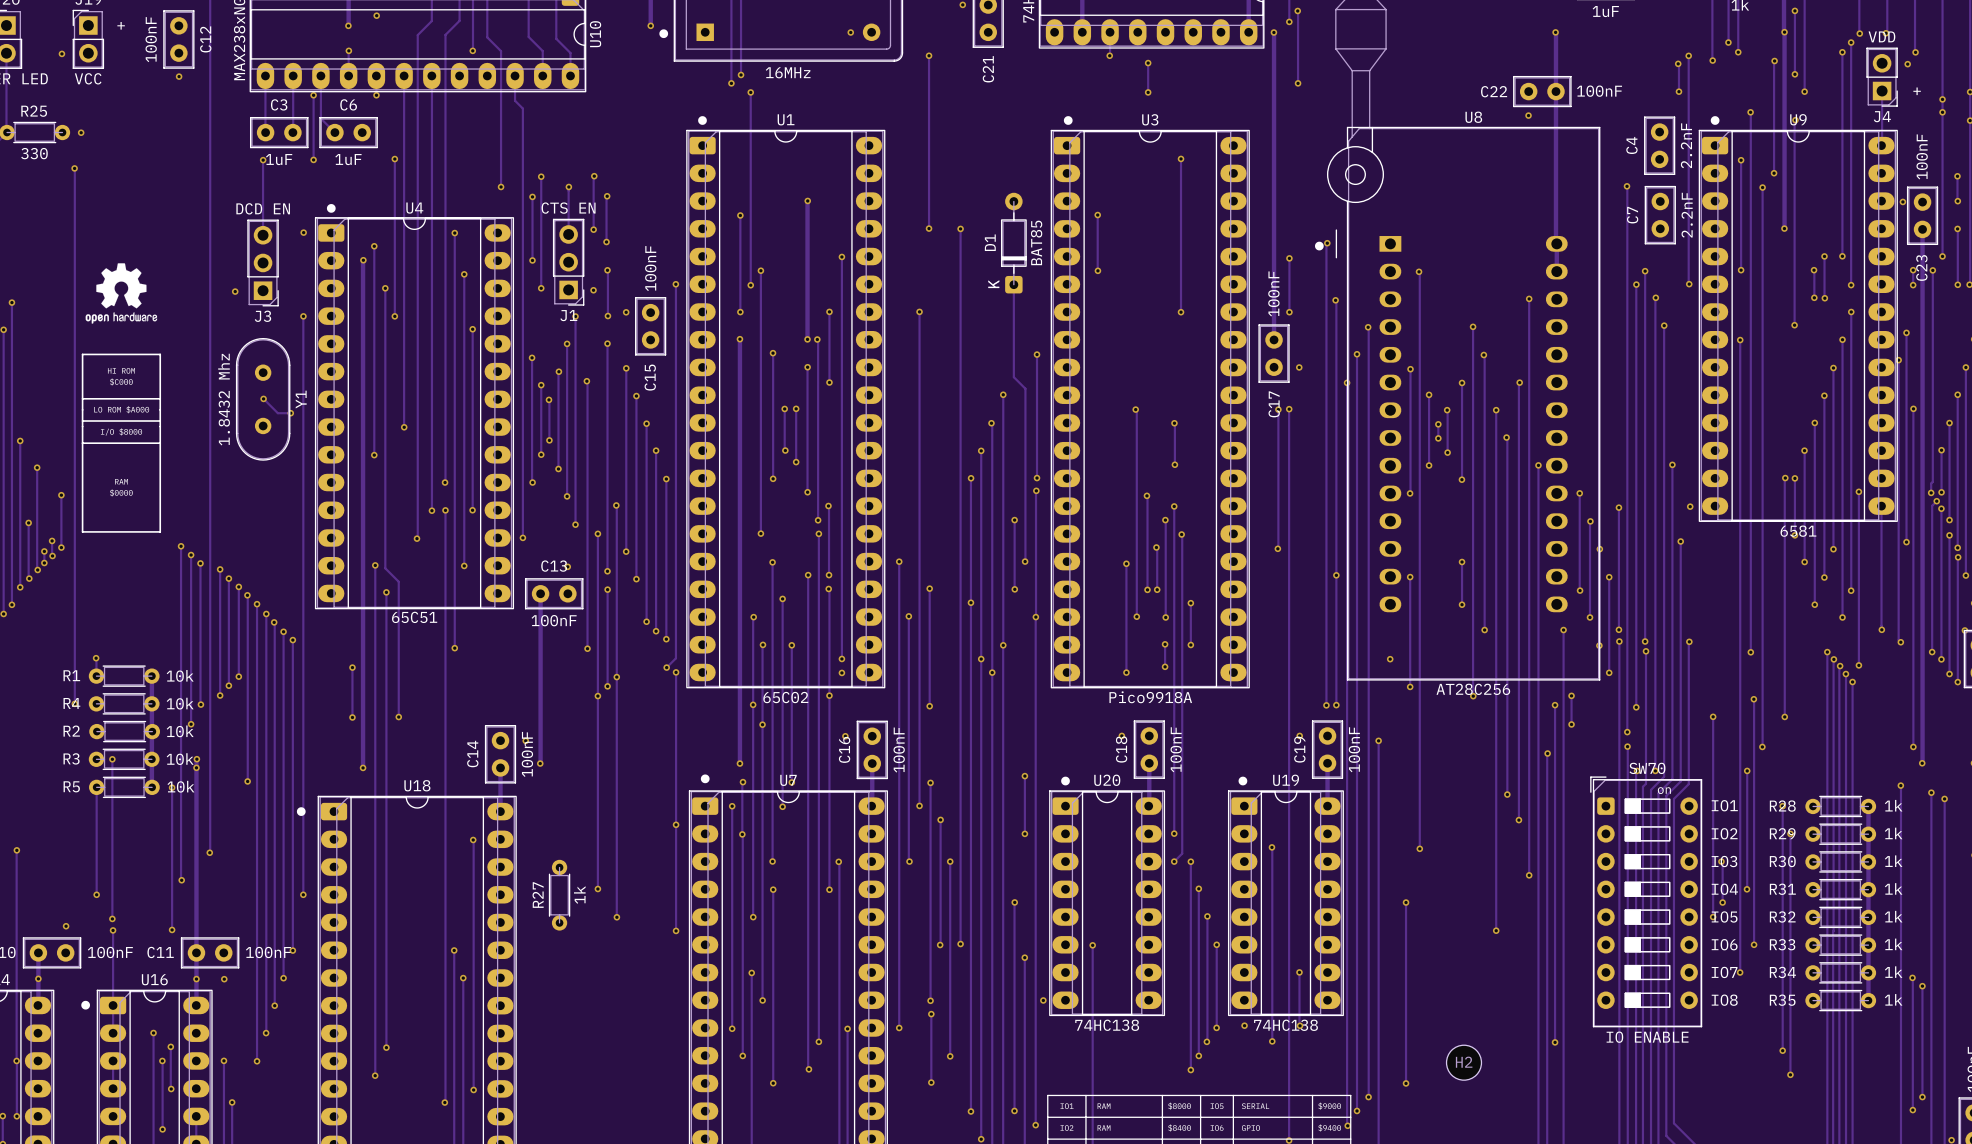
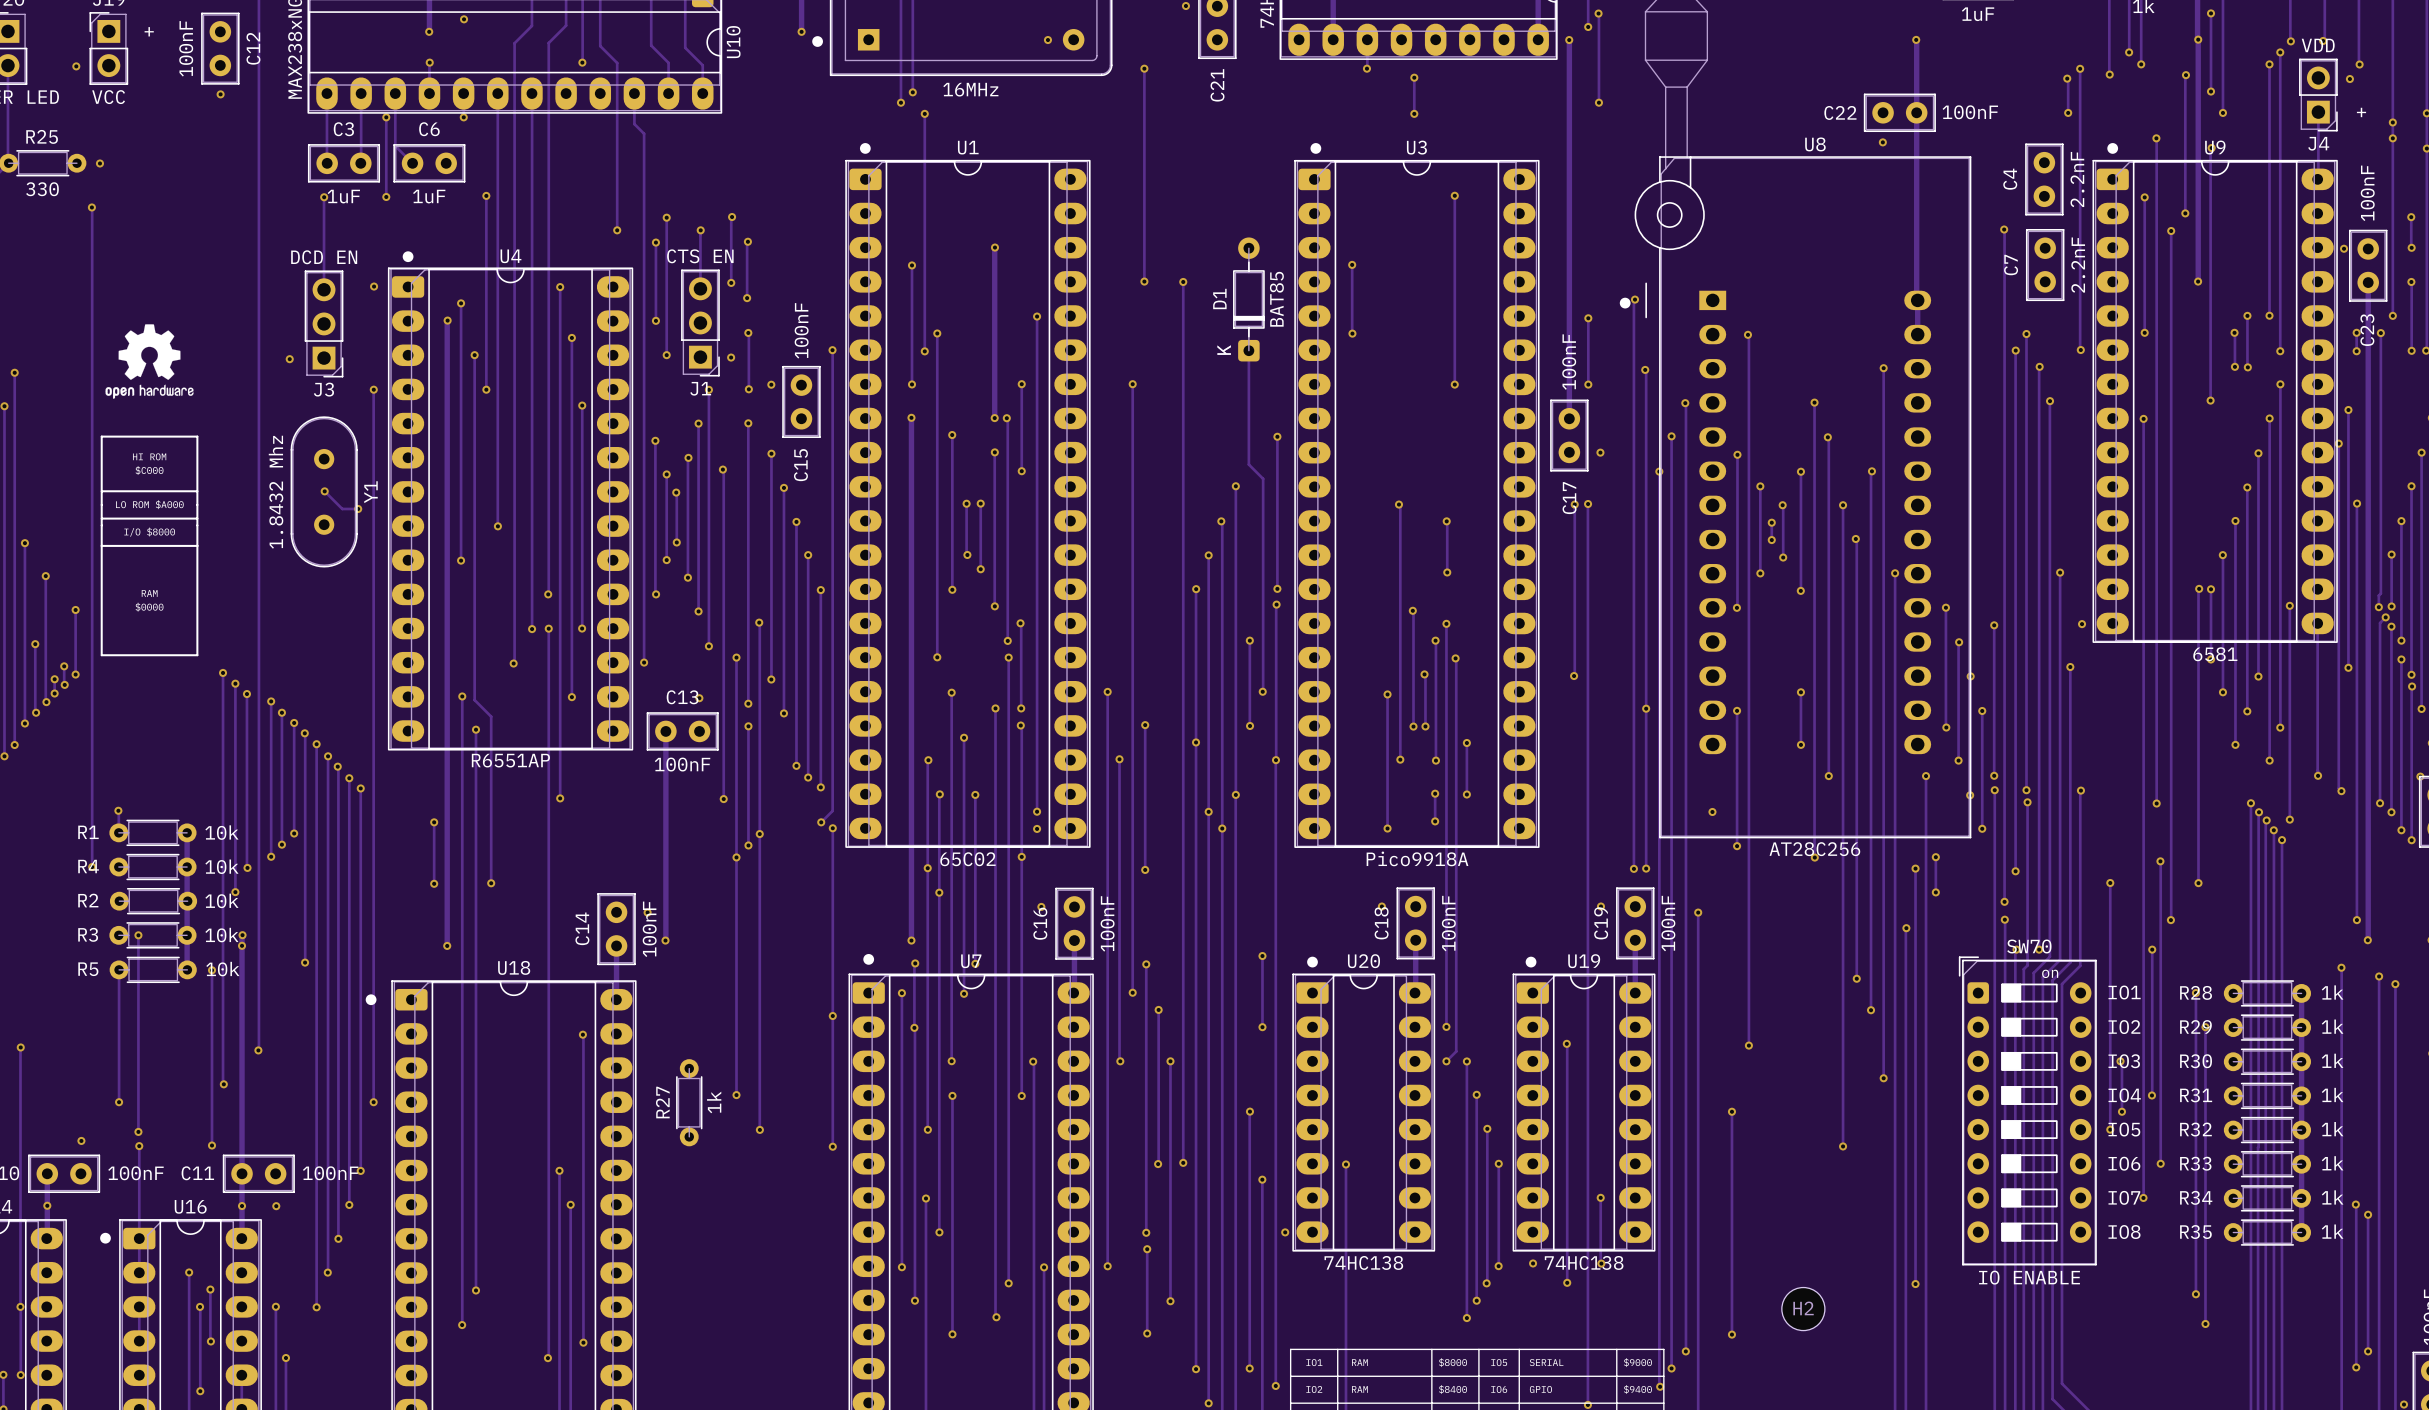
U4 value: 65C51 (414, 617) -> R6551AP (510, 760)

